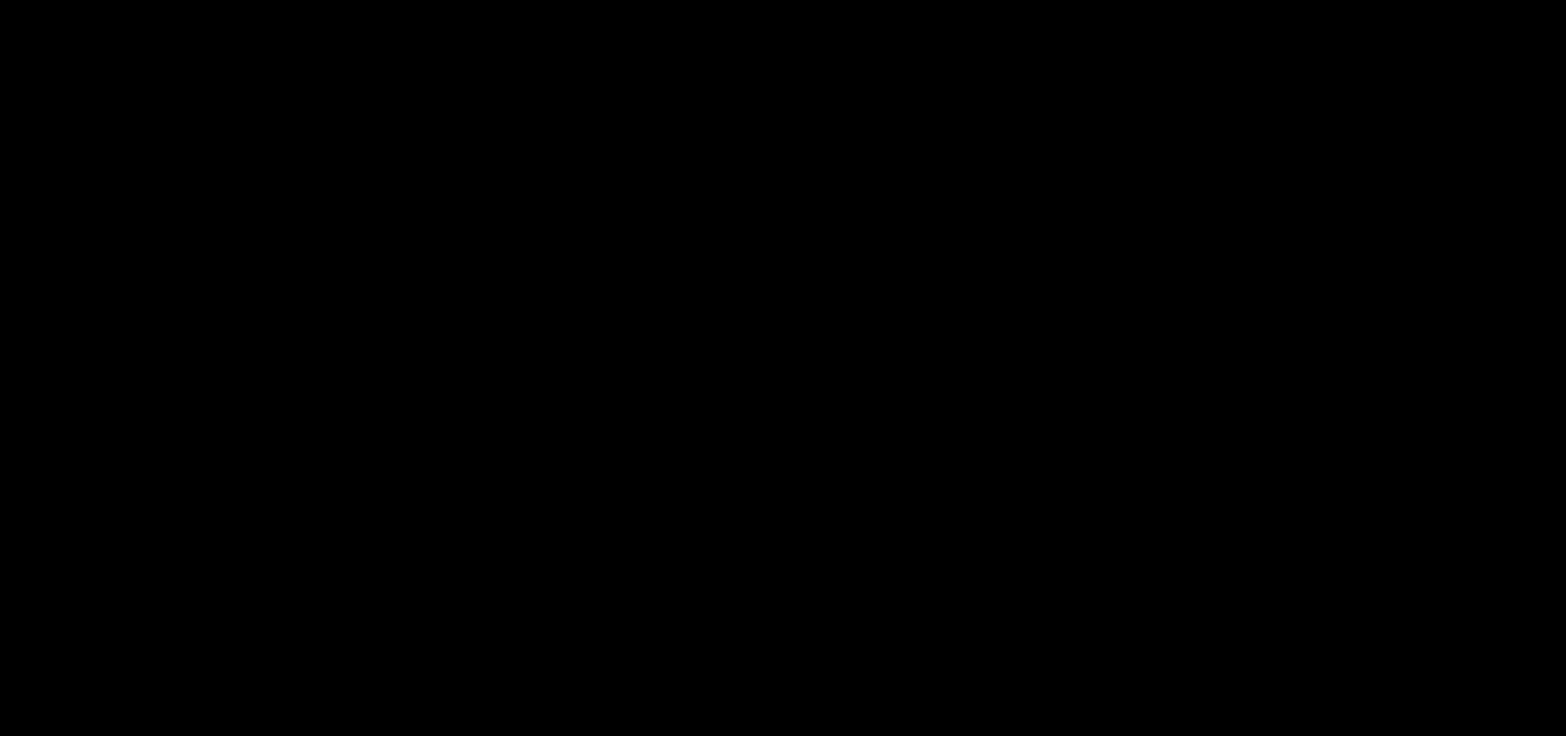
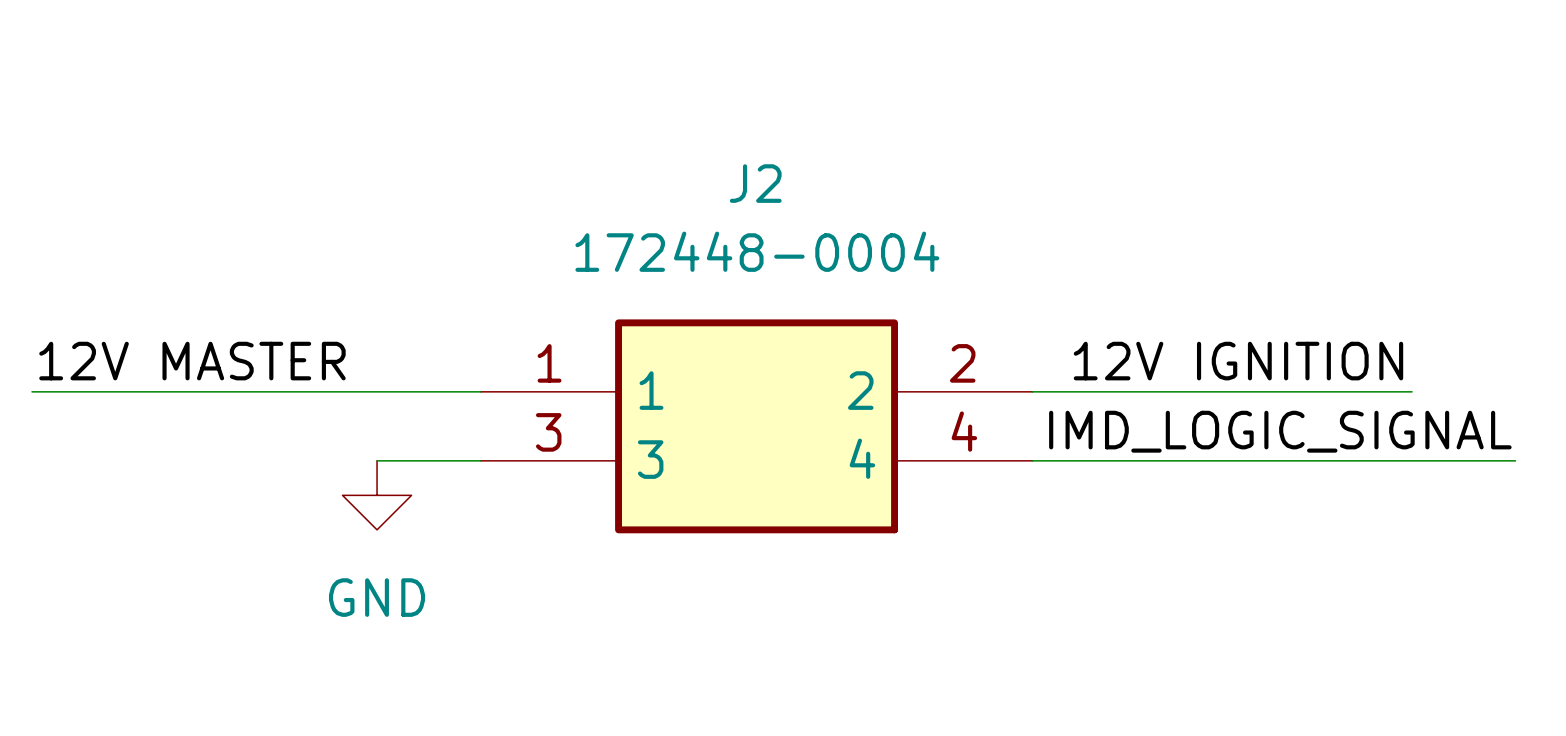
label: none -> 12V MASTER (192, 361)
label: none -> 12V IGNITION (1238, 361)
wire: none -> (32, 391) (480, 391)
wire: none -> (1032, 391) (1412, 391)
J2: none -> 172448-0004 (756, 426)
label: none -> IMD_LOGIC_SIGNAL (1280, 431)
wire: none -> (377, 460) (480, 460)
wire: none -> (1032, 460) (1515, 460)
power symbol: none -> GND (377, 495)

